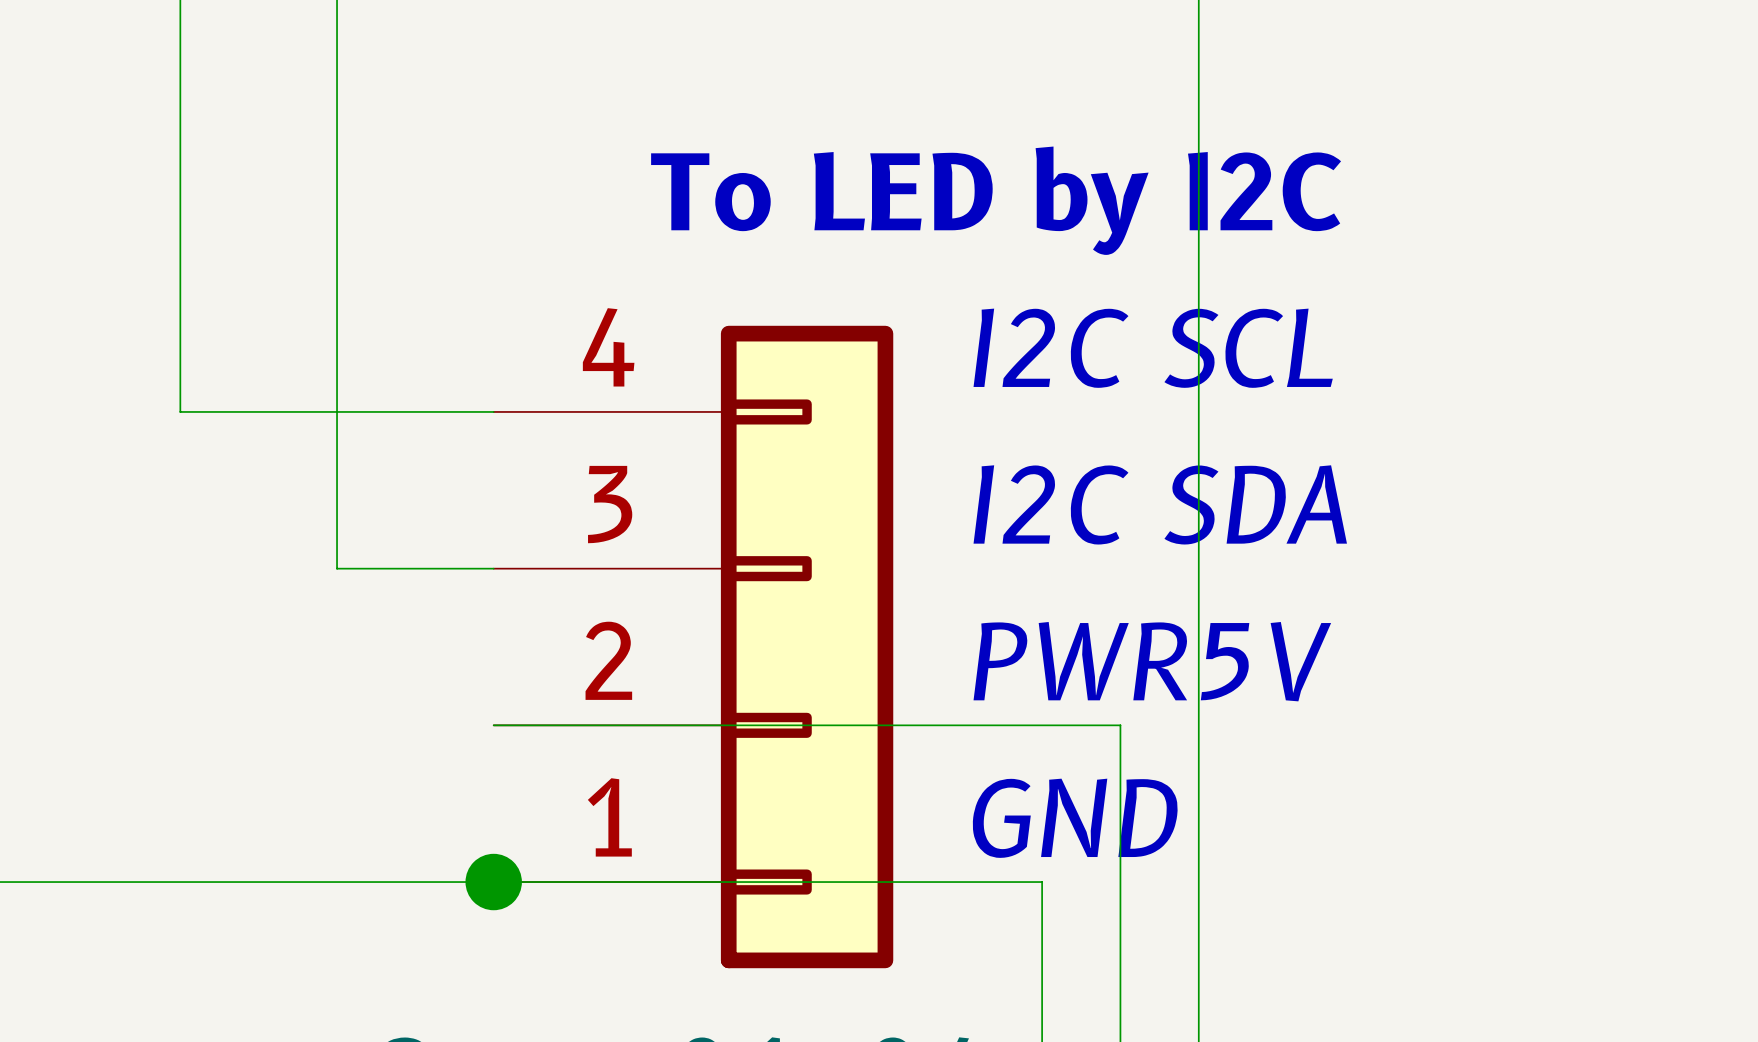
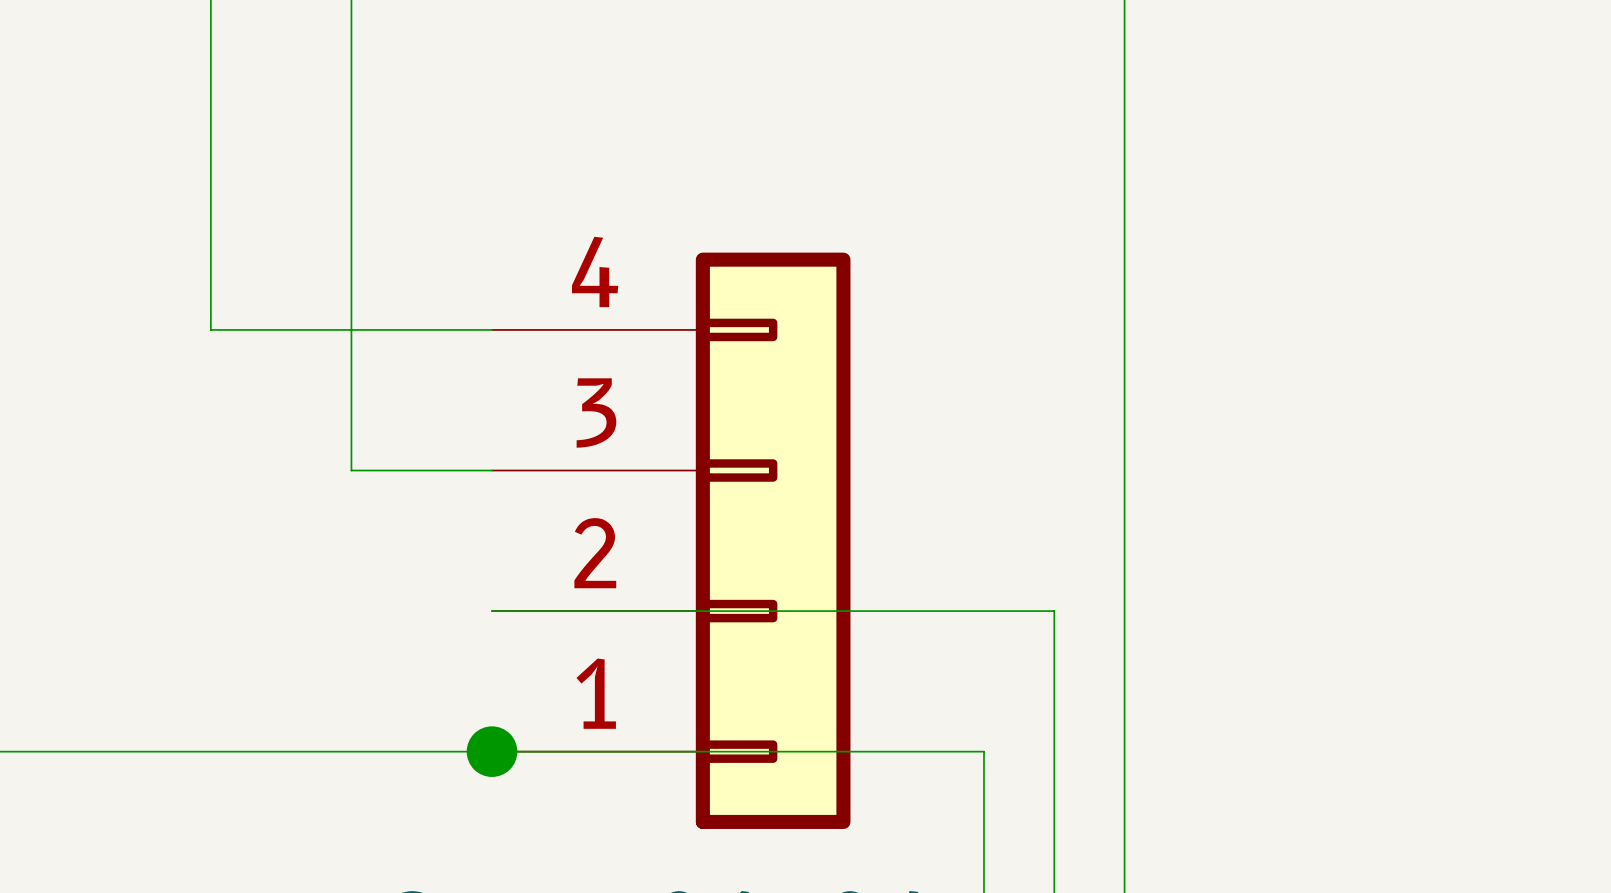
text: To LED by I2C (996, 200) -> none
text: I2C SCL (1153, 348) -> none
text: I2C SDA (1160, 504) -> none
text: PWR5V (1152, 661) -> none
text: GND (1075, 818) -> none

